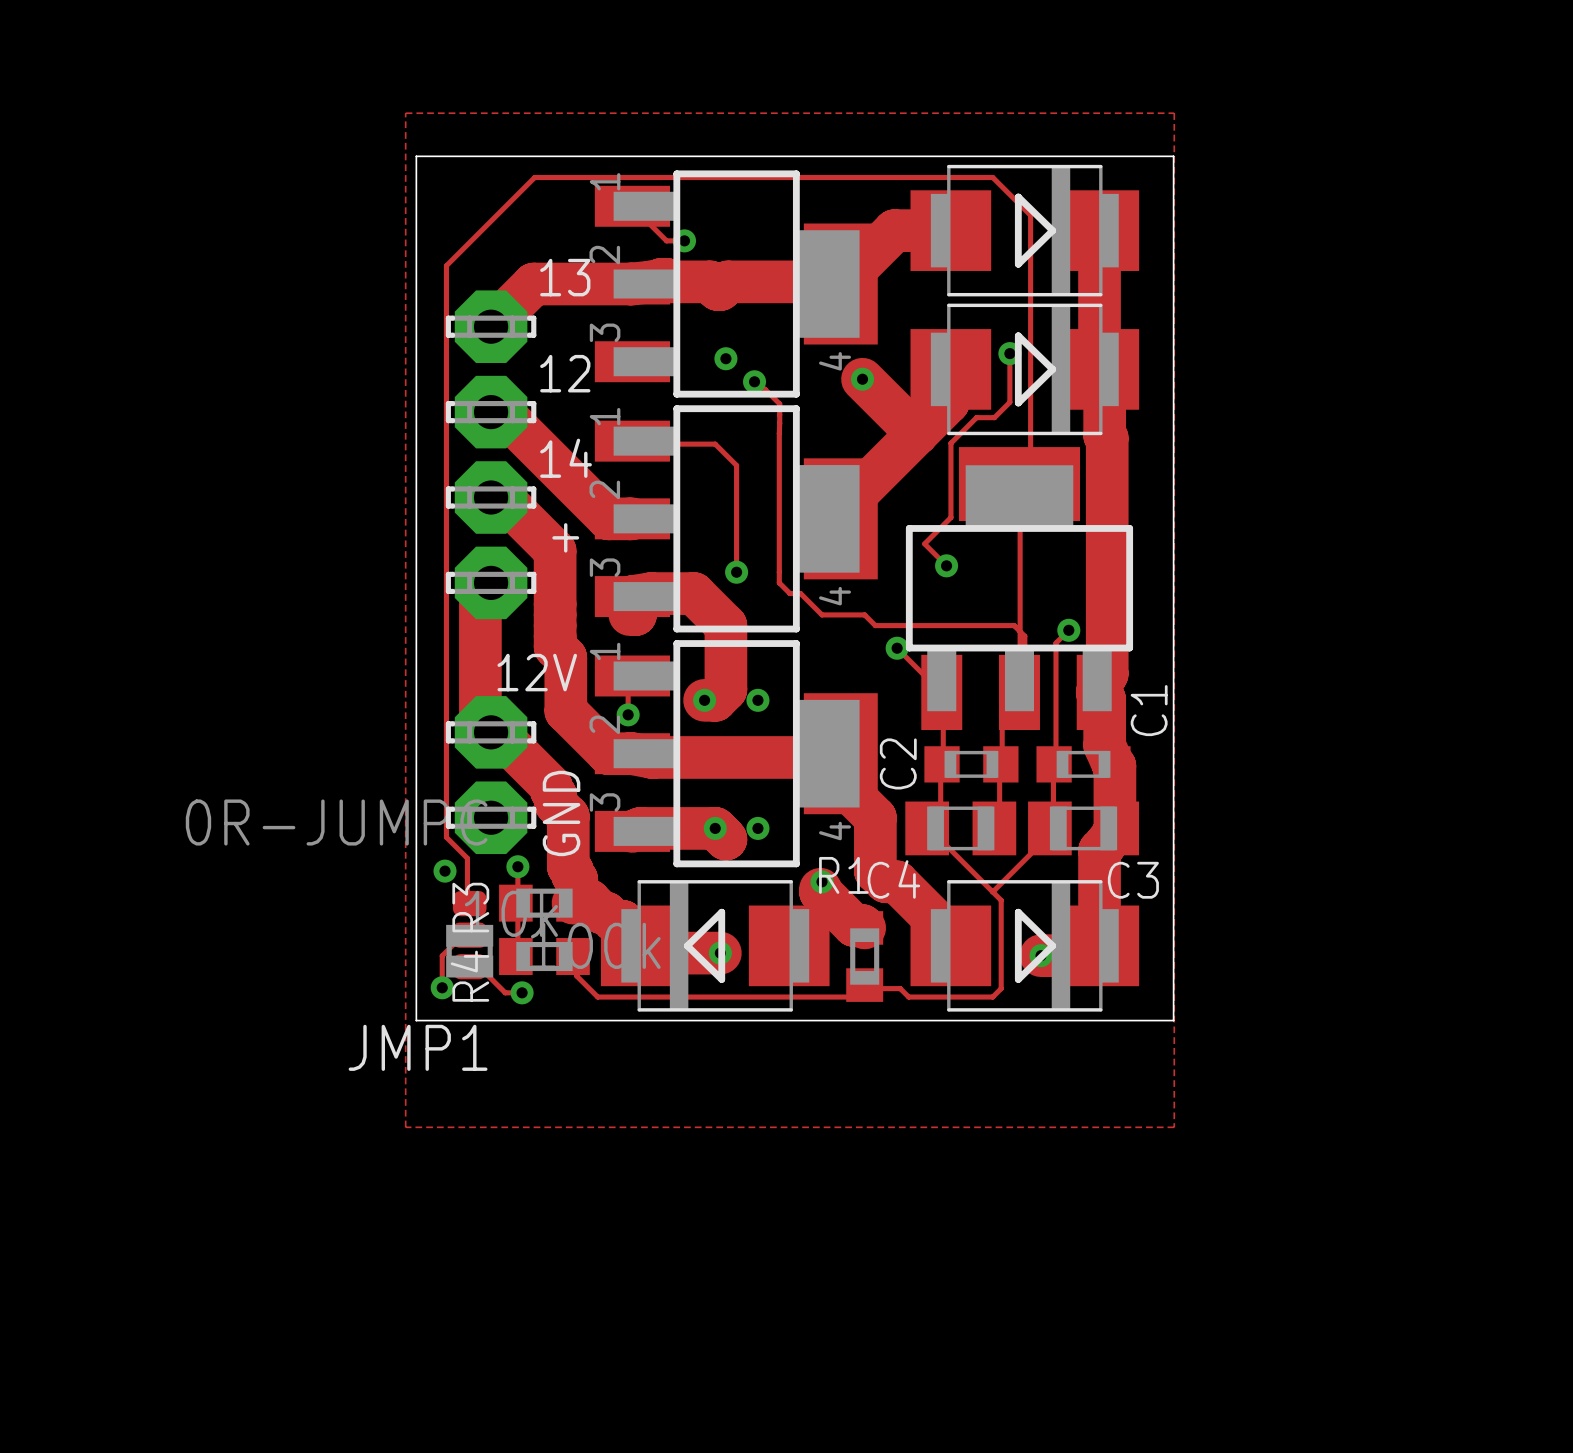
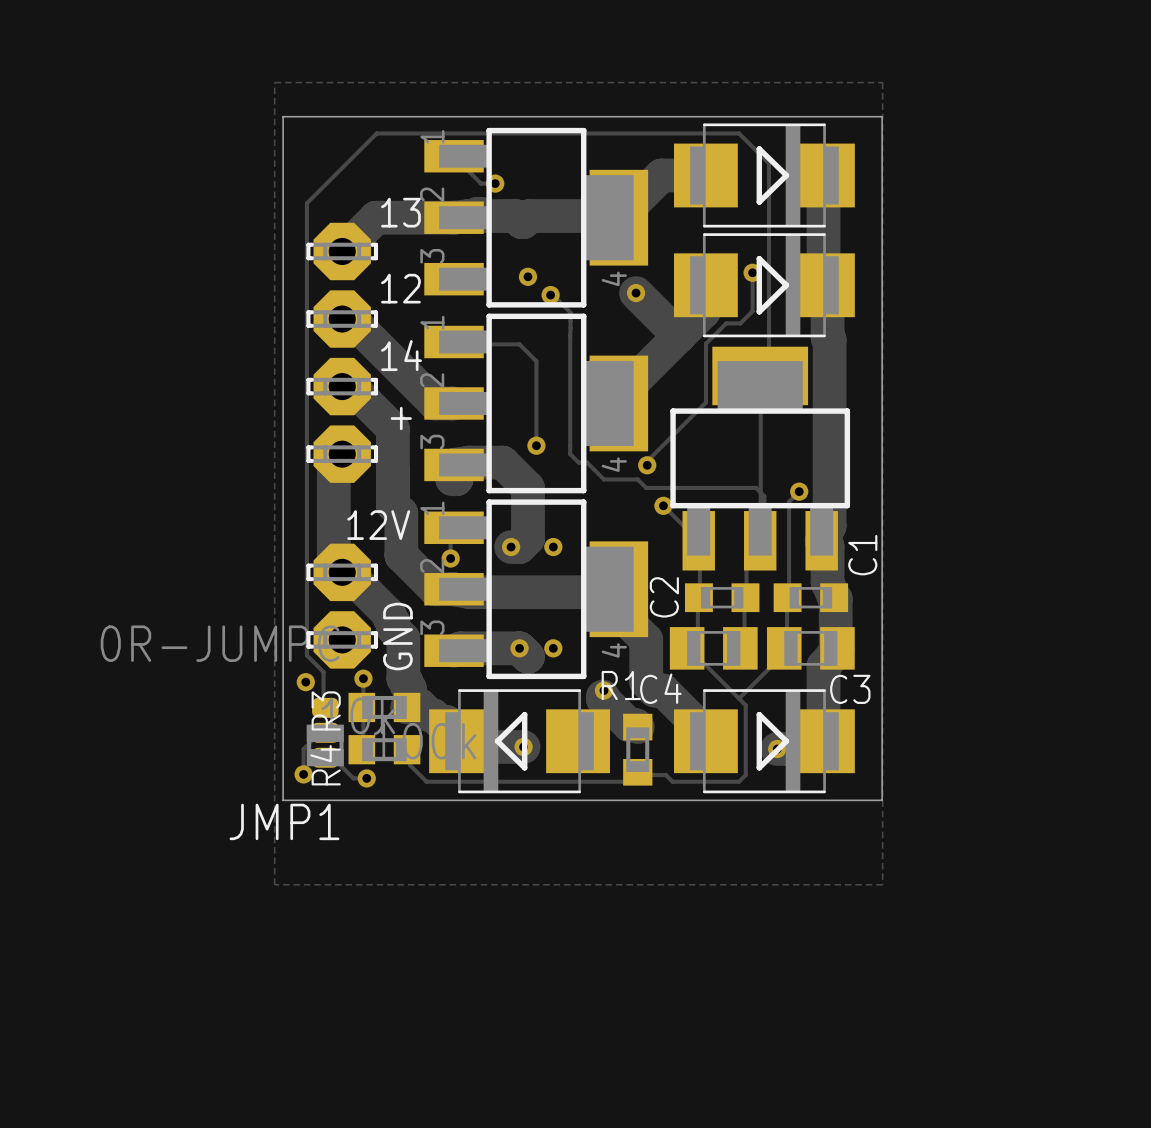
track: (924, 543) (946, 565) -> (685, 423) (647, 461) (647, 465)
via position: (946, 565) -> (647, 465)

